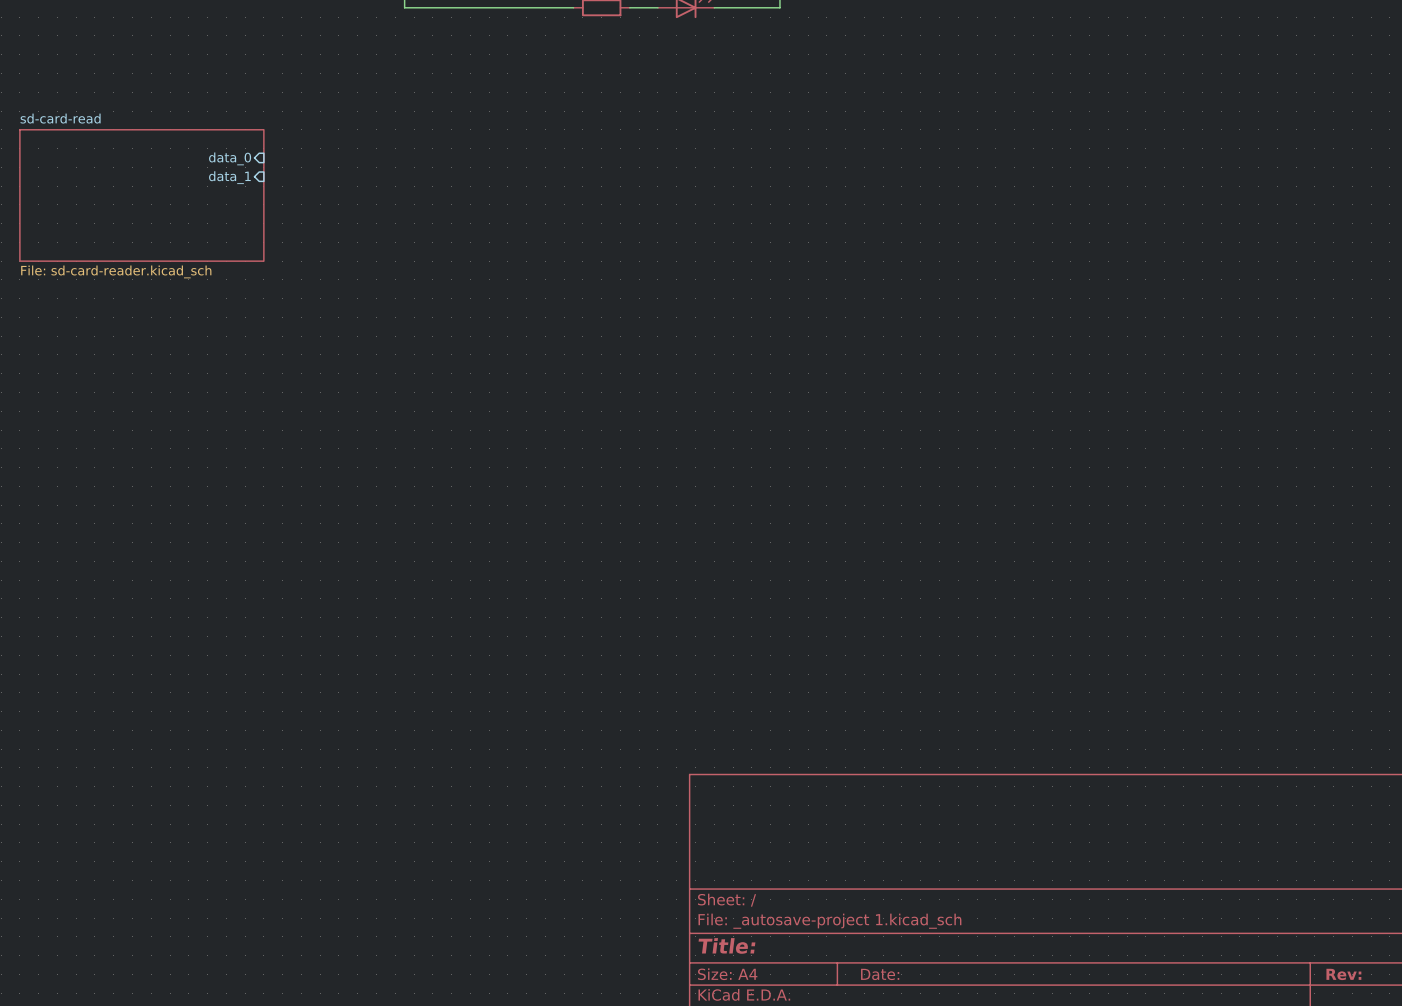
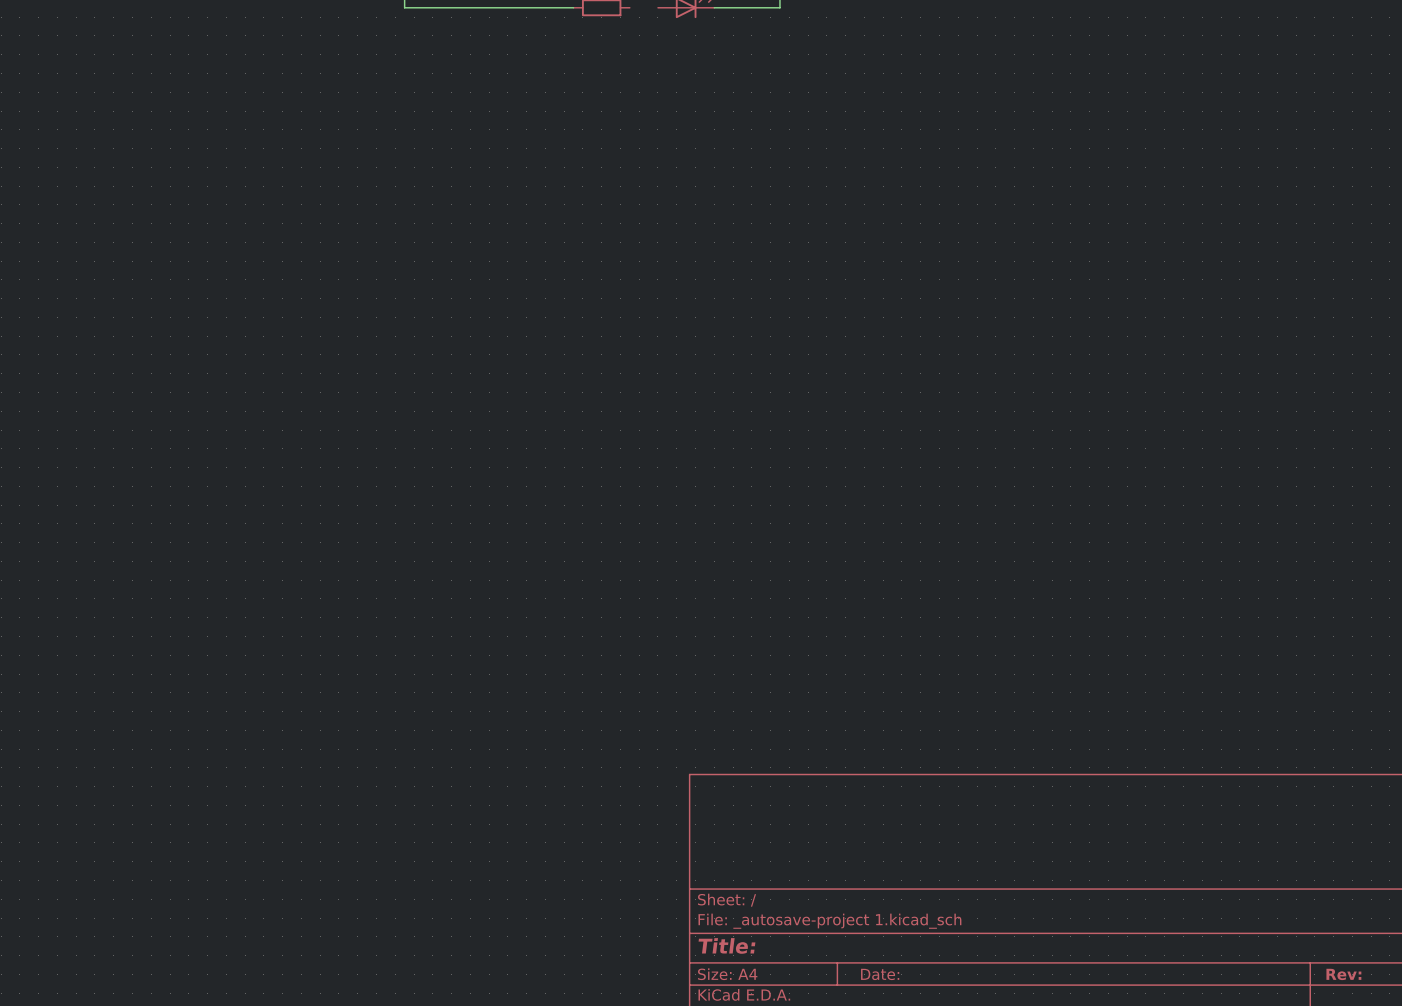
wire: (629, 7) (657, 7) -> none
sheet pin: data_0 (230, 158) -> none
sheet pin: data_1 (229, 177) -> none
sheet sd-card-read: File: sd-card-reader.kicad_sch (141, 195) -> none

